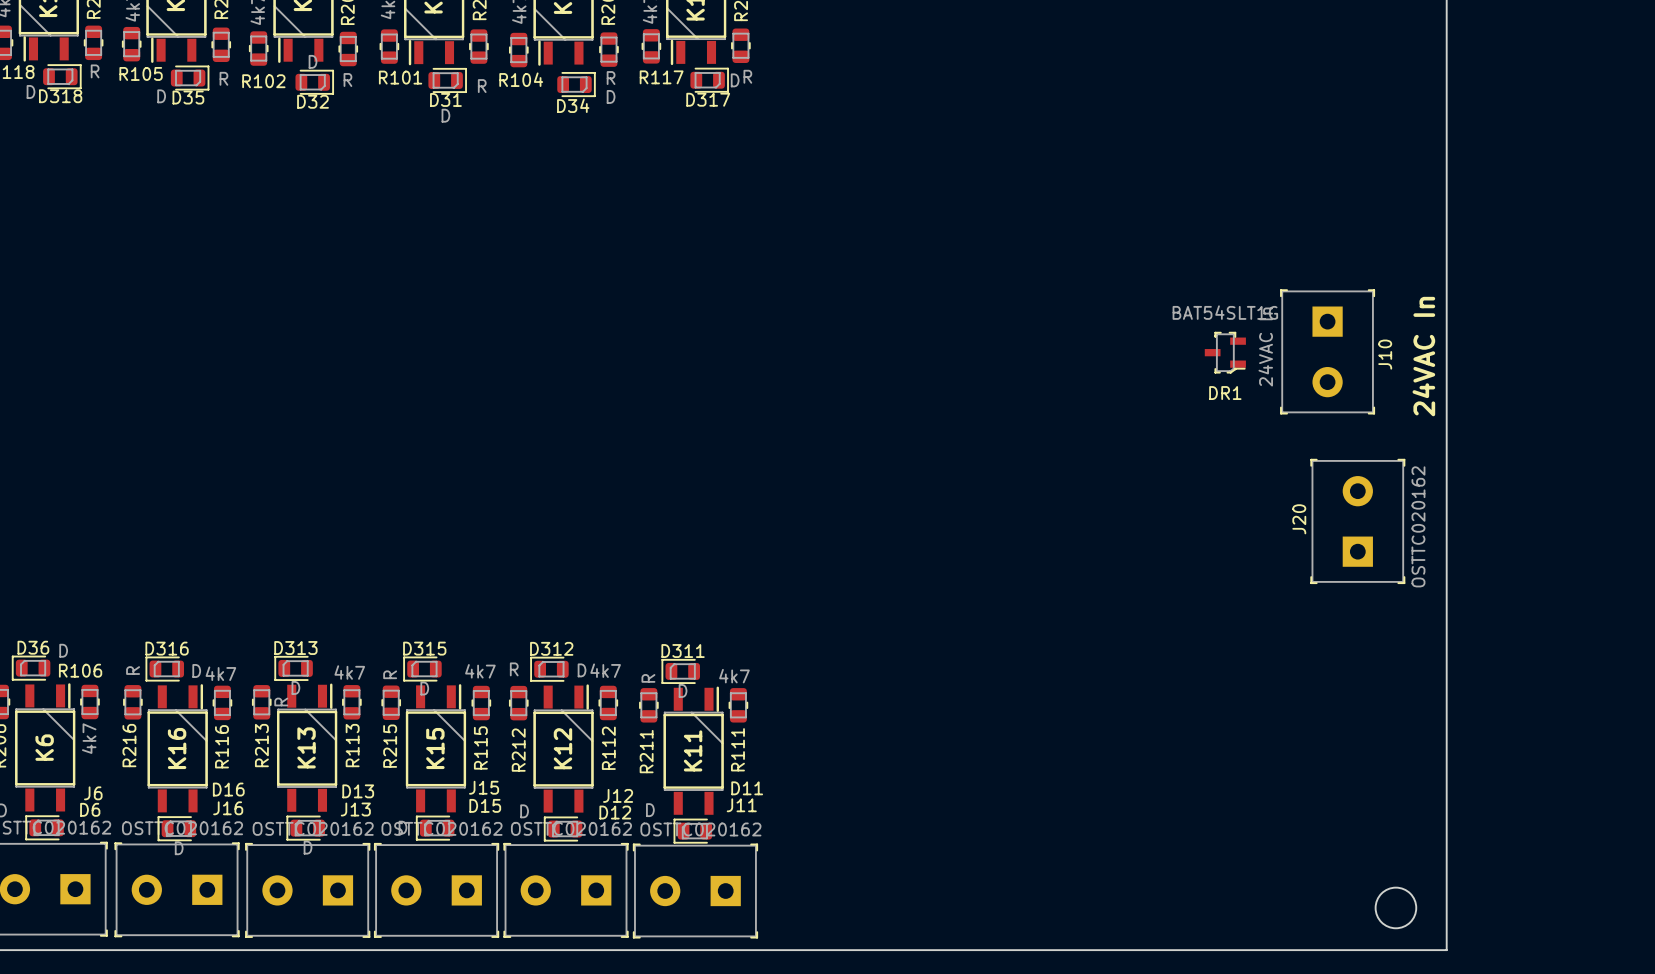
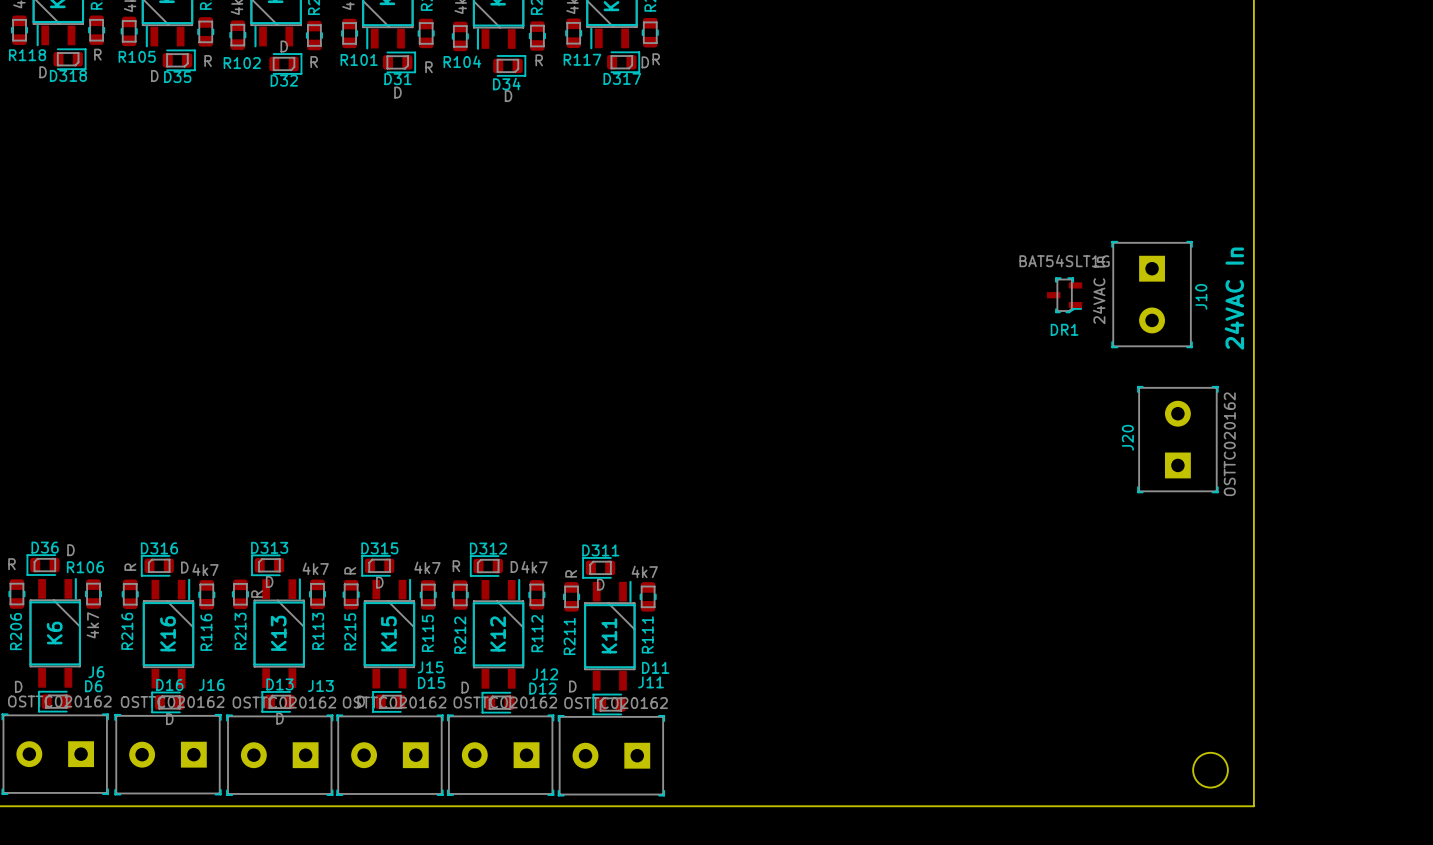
D34 value position: D (611, 96) -> D (508, 96)
D16 name position: D16 (228, 789) -> D16 (169, 684)
D13 name position: D13 (358, 791) -> D13 (279, 684)

